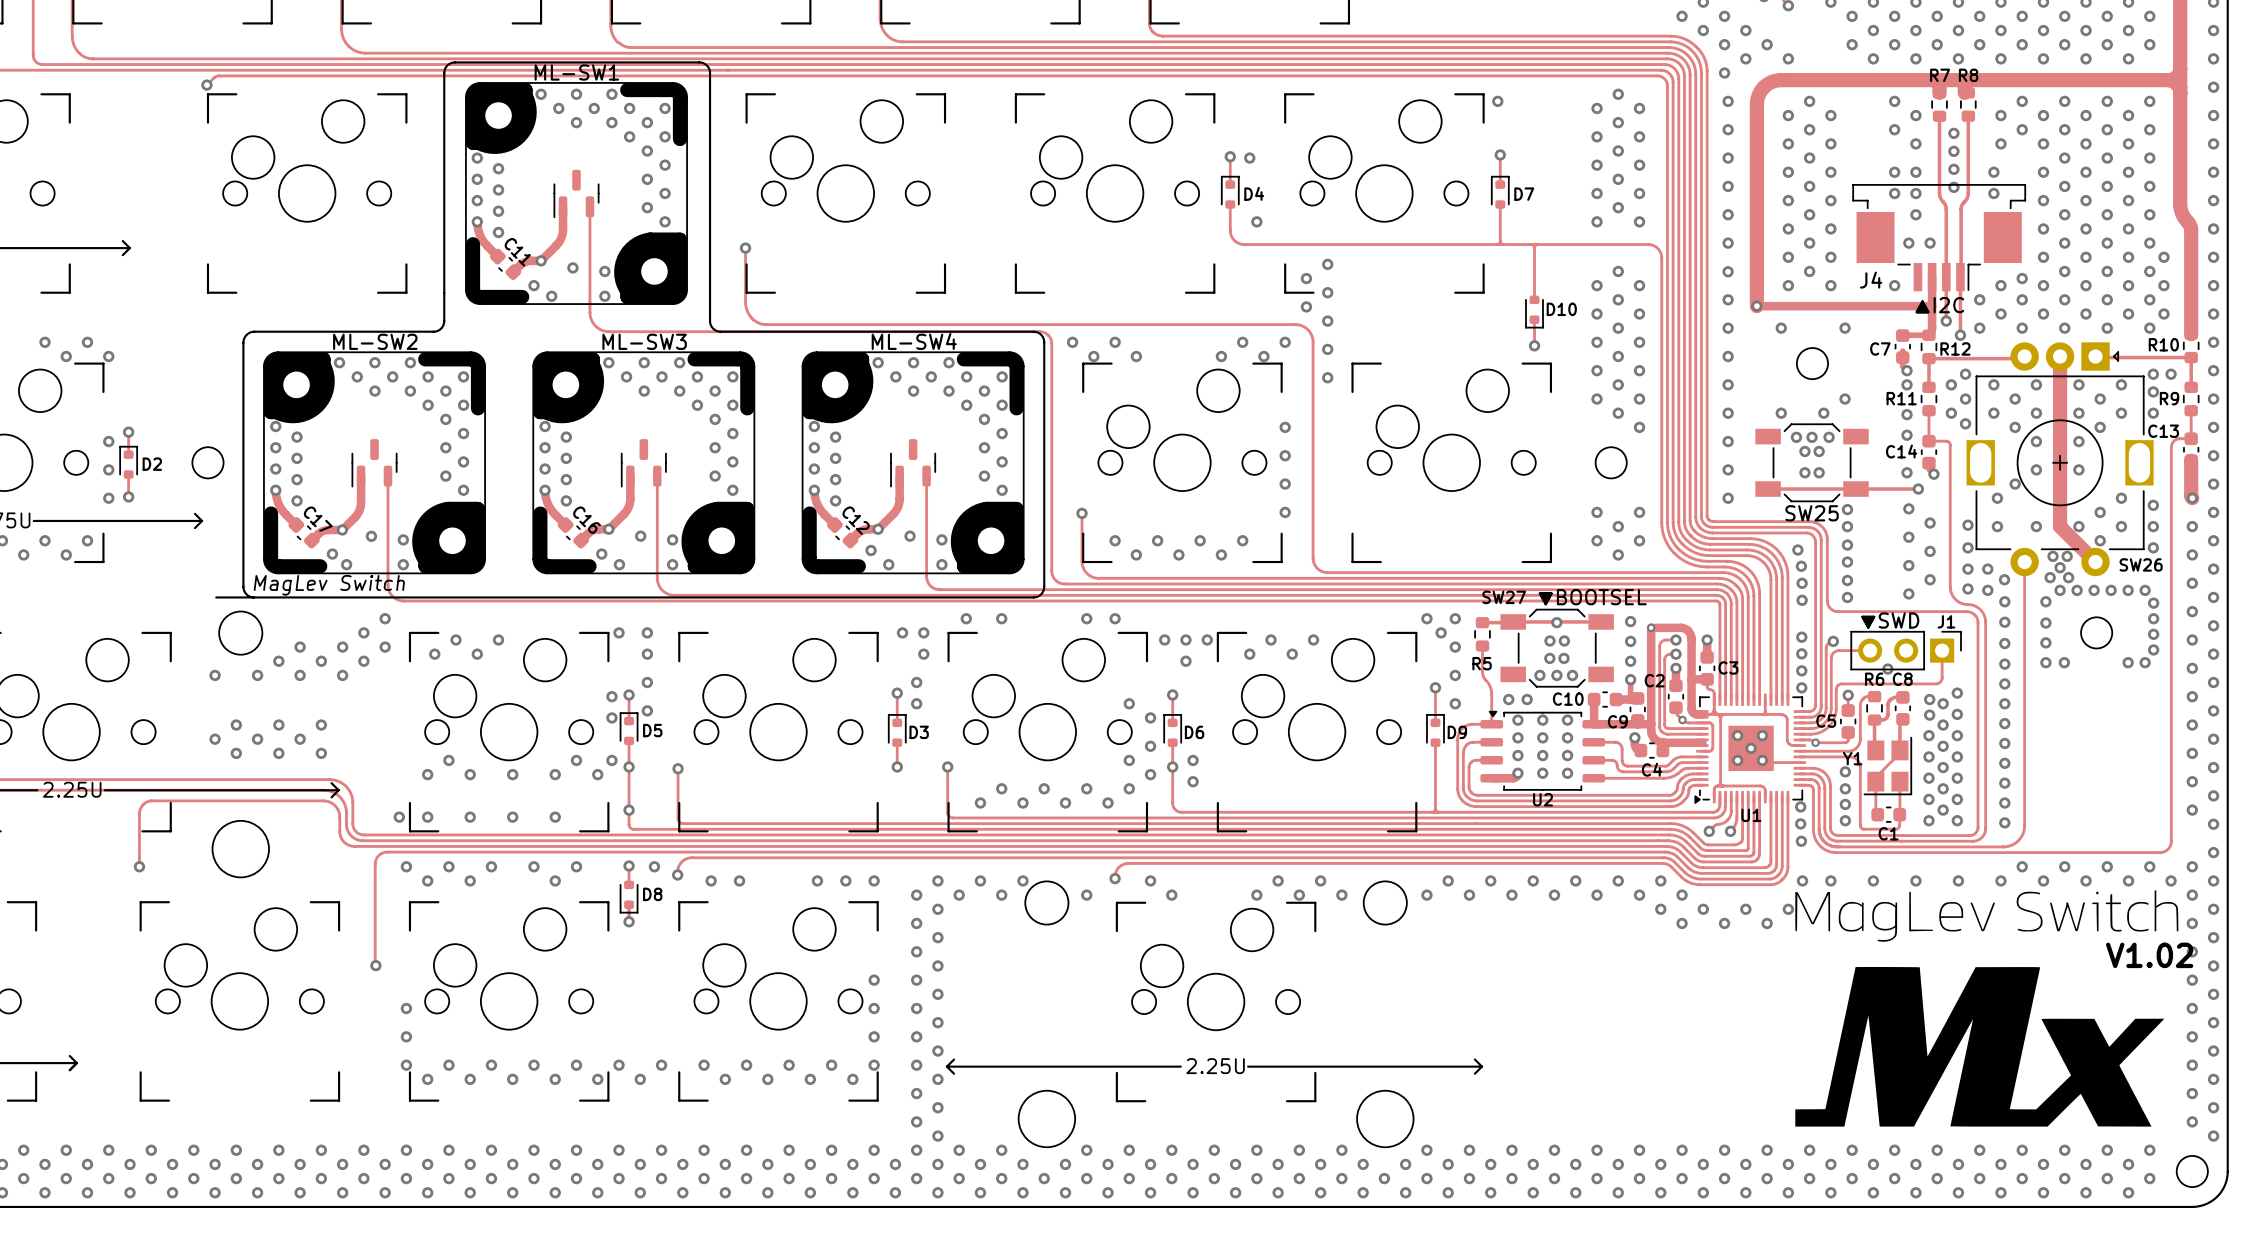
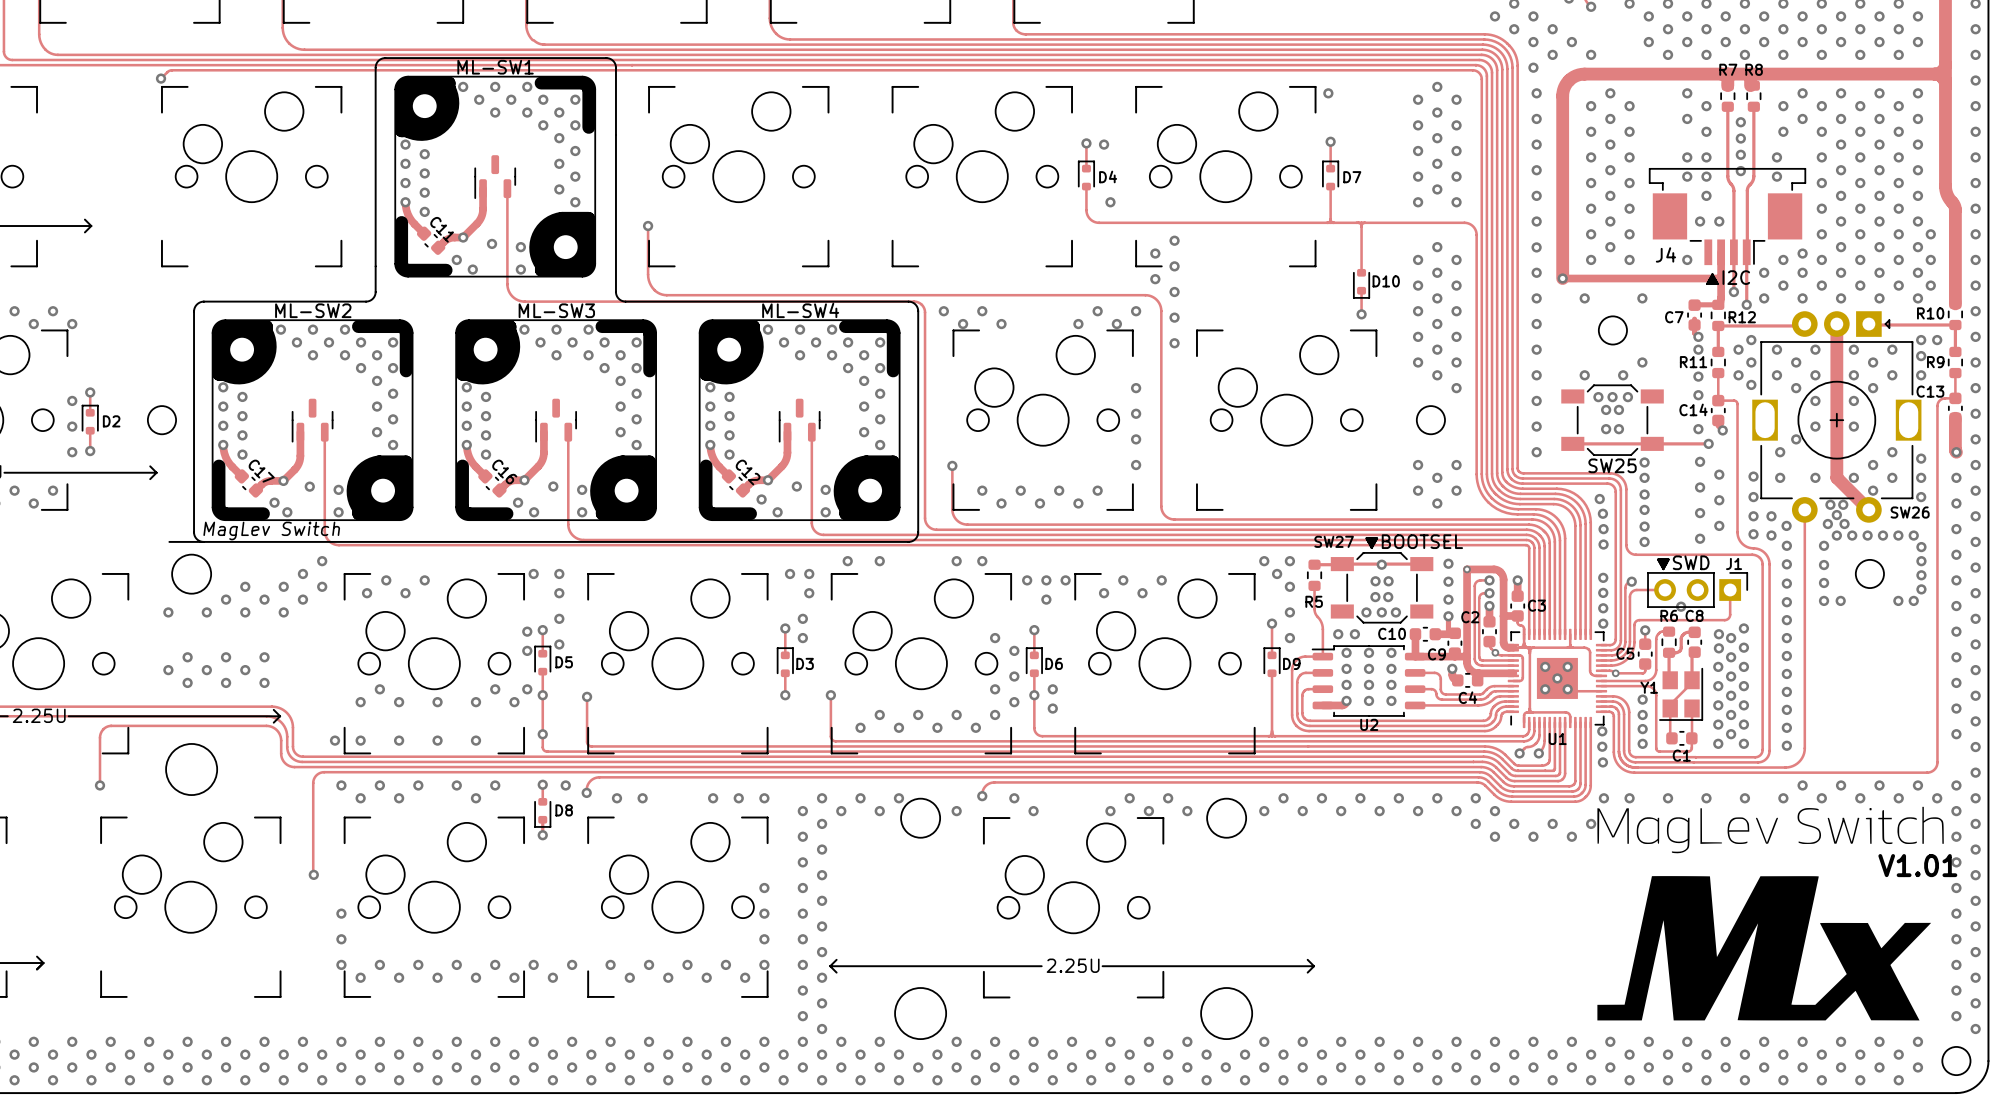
U1 footprint: [1694, 693, 1807, 804] -> [1507, 628, 1608, 729]
U2 footprint: [1480, 710, 1606, 791] -> [1311, 645, 1426, 717]
text: V1.02 (2149, 955) -> V1.01 (1917, 865)

